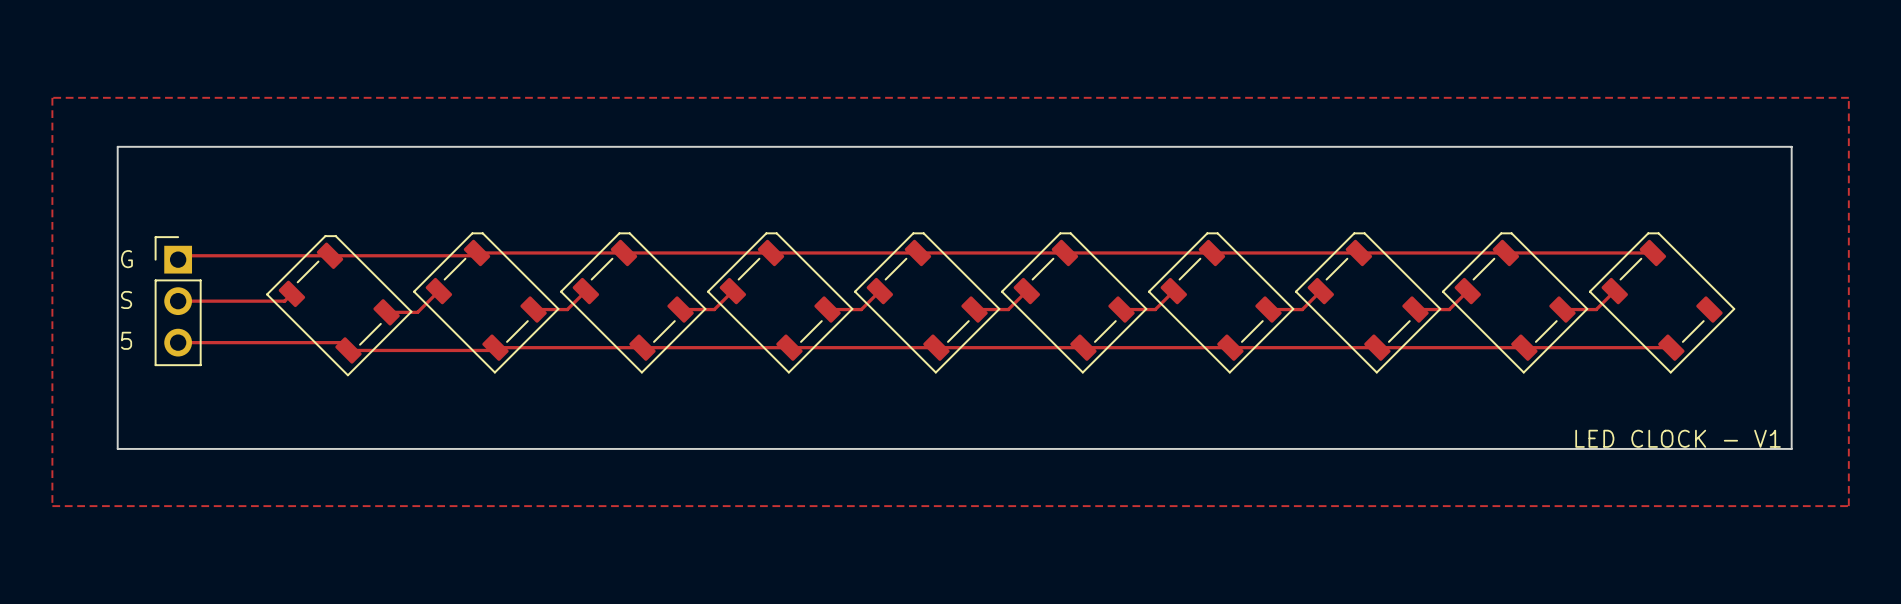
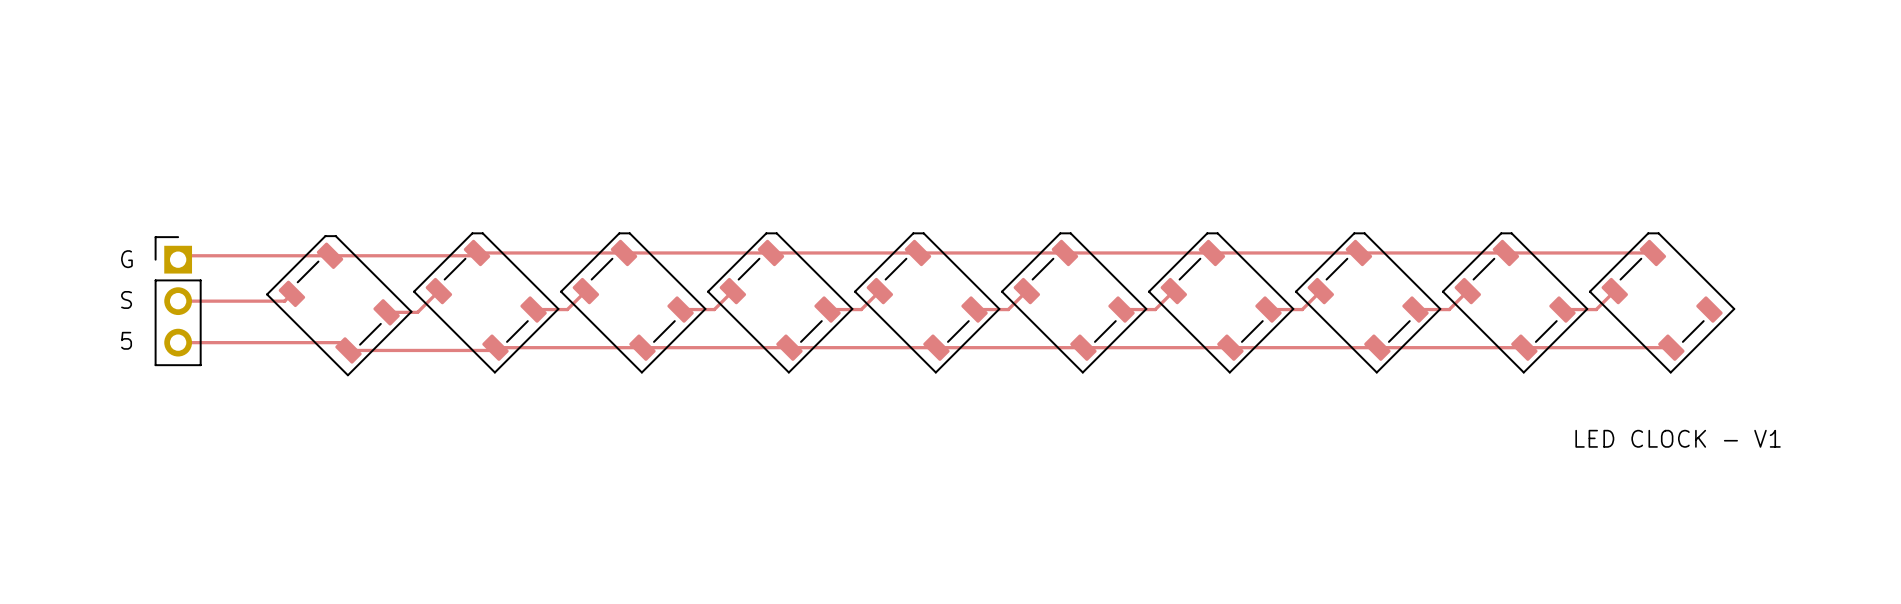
zone outline: (52, 97) (1848, 97) (1848, 506) (52, 506) (52, 97) -> none
board edge: (117, 146) (1791, 146) (1791, 448) (117, 448) (117, 146) -> none

